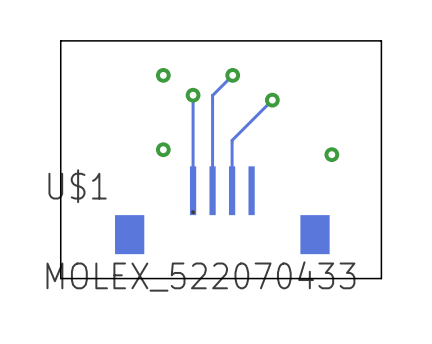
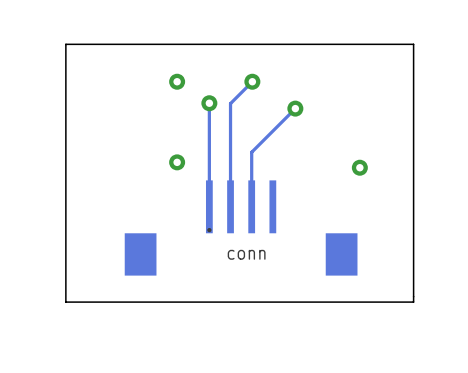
U$1 name: U$1 (77, 186) -> none
text: none -> conn (246, 254)
U$1 value: MOLEX_522070433 (200, 276) -> none

